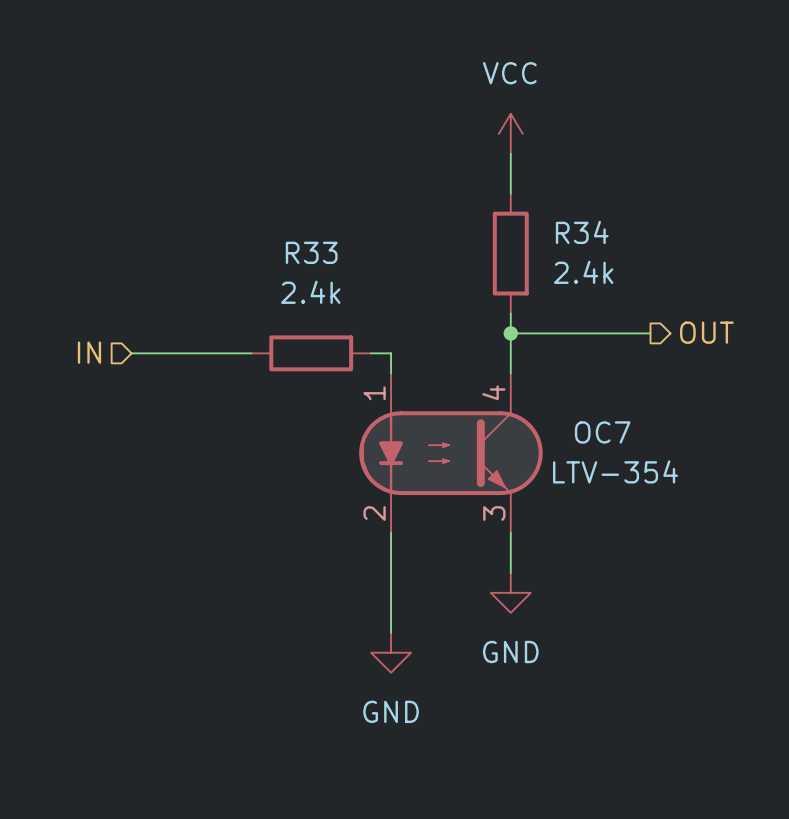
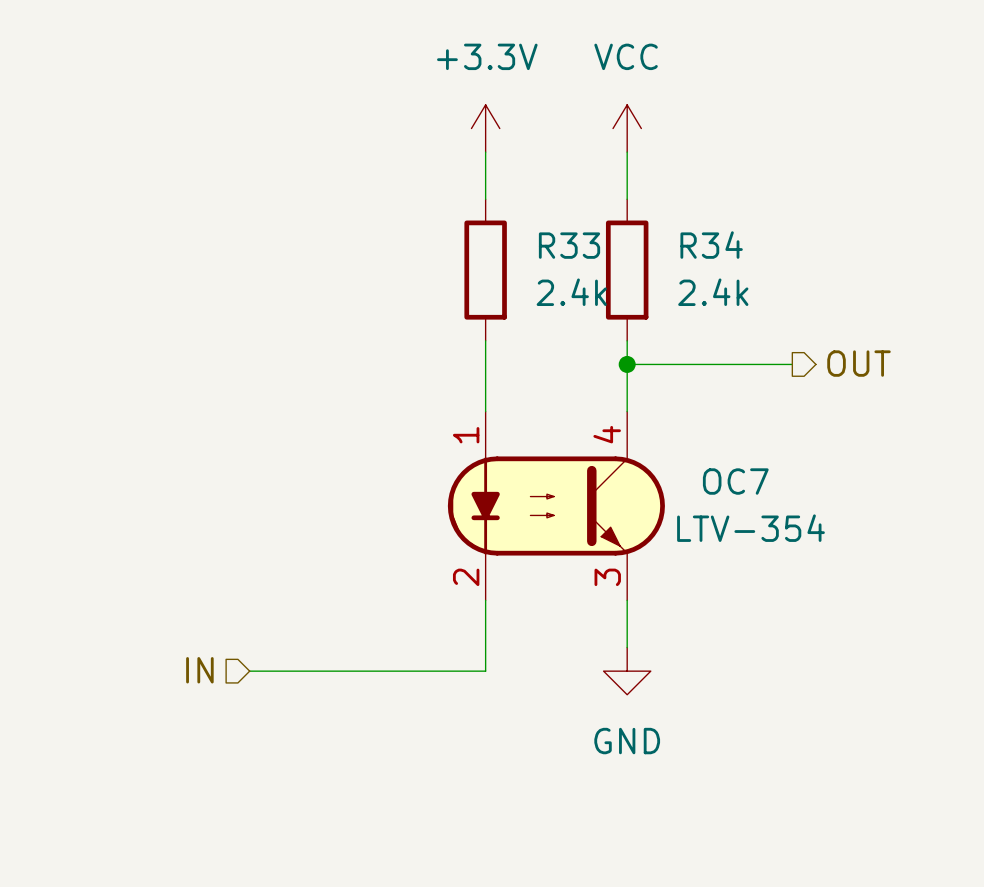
power symbol: none -> +3.3V (485, 128)
wire: none -> (485, 152) (485, 199)
R33 name position: R33 (311, 252) -> R33 (569, 245)
hierarchical label position: IN (89, 352) -> IN (199, 670)
wire: (131, 353) (251, 353) -> none
R33 rotation: 0° (311, 353) -> 90° clockwise (485, 270)
R33 position: (311, 353) -> (485, 270)
wire: (371, 353) (391, 353) -> (485, 340) (485, 388)
wire: (391, 592) (391, 632) -> (485, 671) (249, 671)
power symbol: GND (391, 652) -> none

